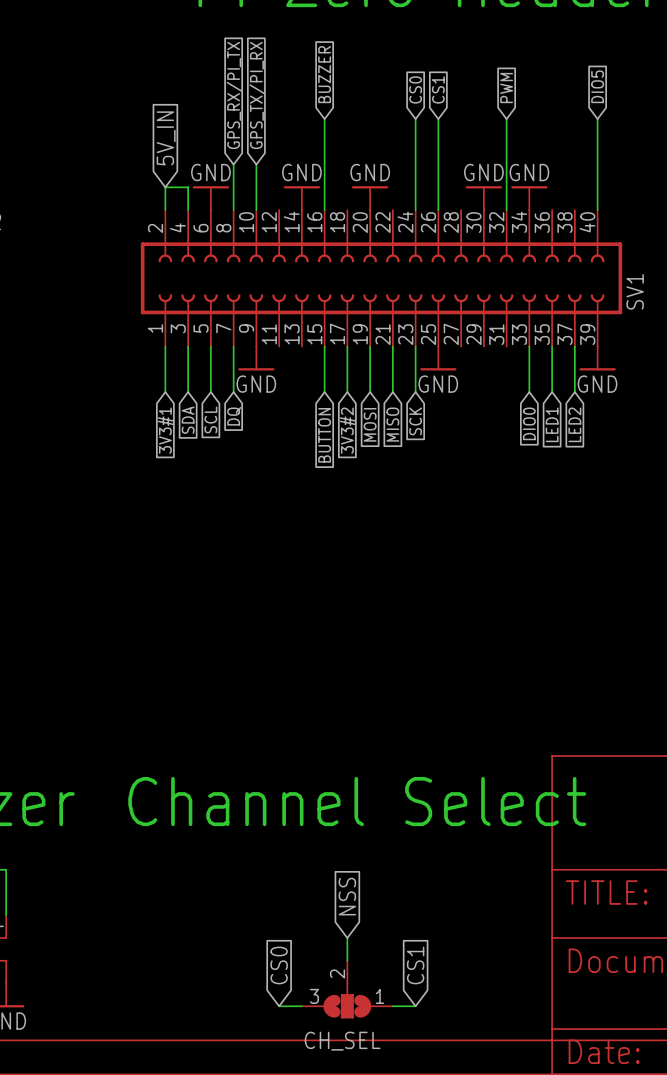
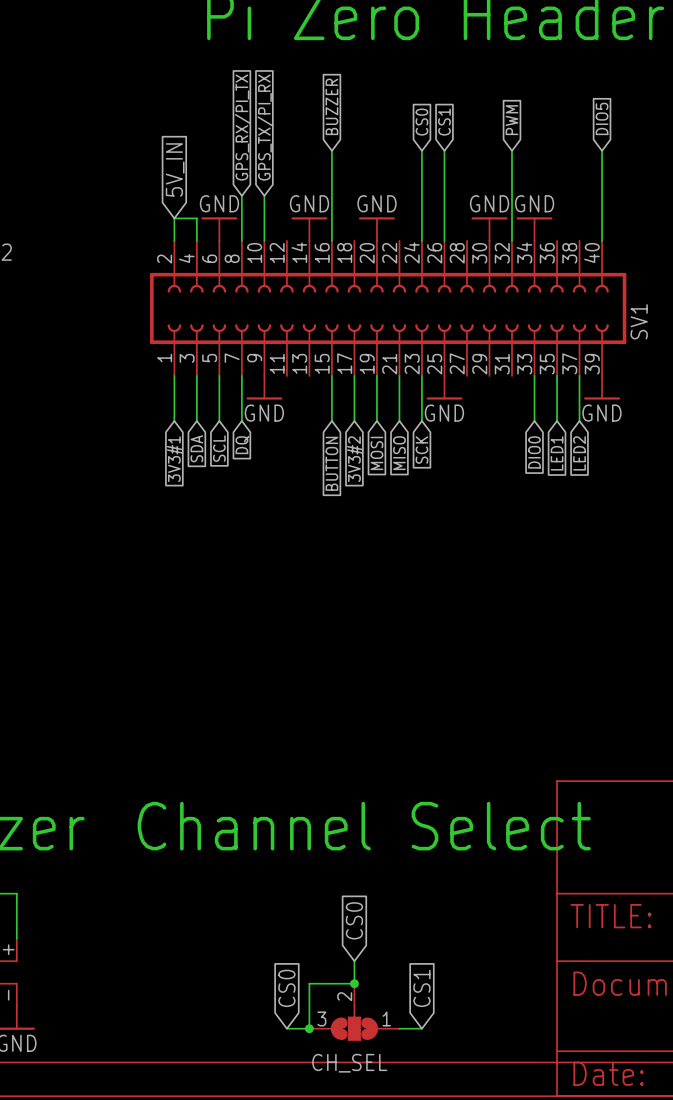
global label: NSS (347, 896) -> CS0 (354, 920)
wire: none -> (354, 983) (309, 983) (309, 1028)
junction: none -> (354, 983)
junction: none -> (309, 1028)

